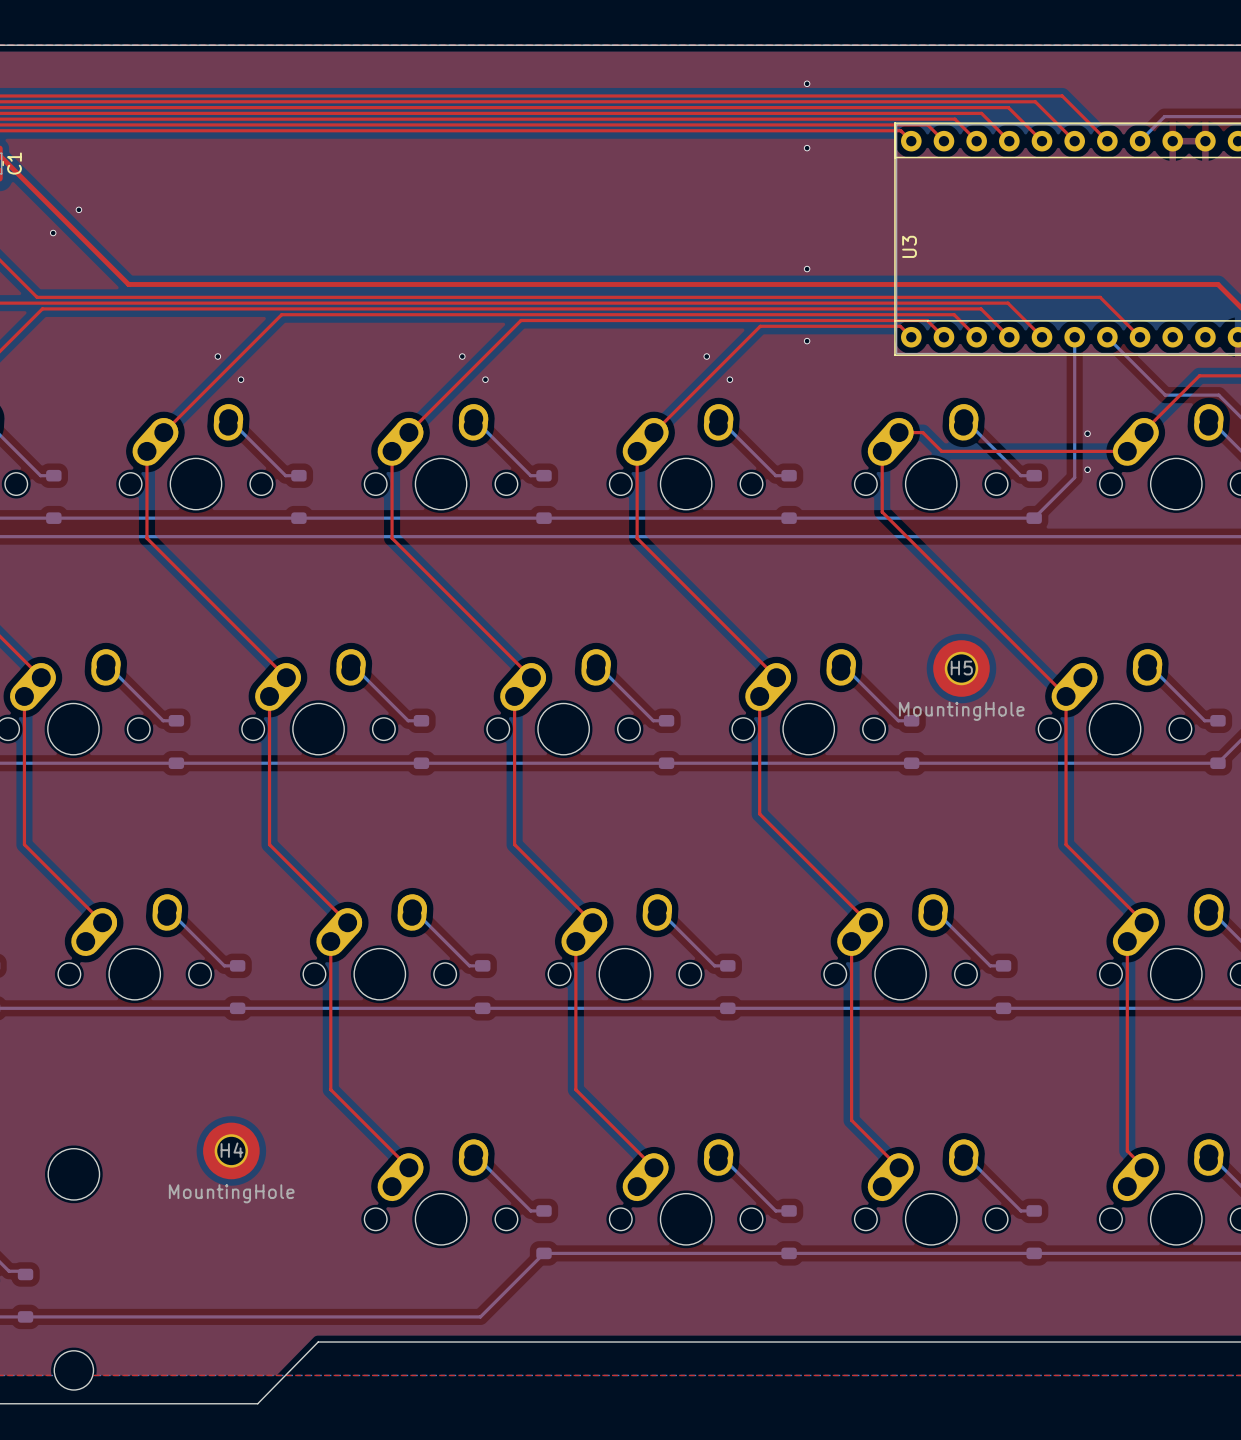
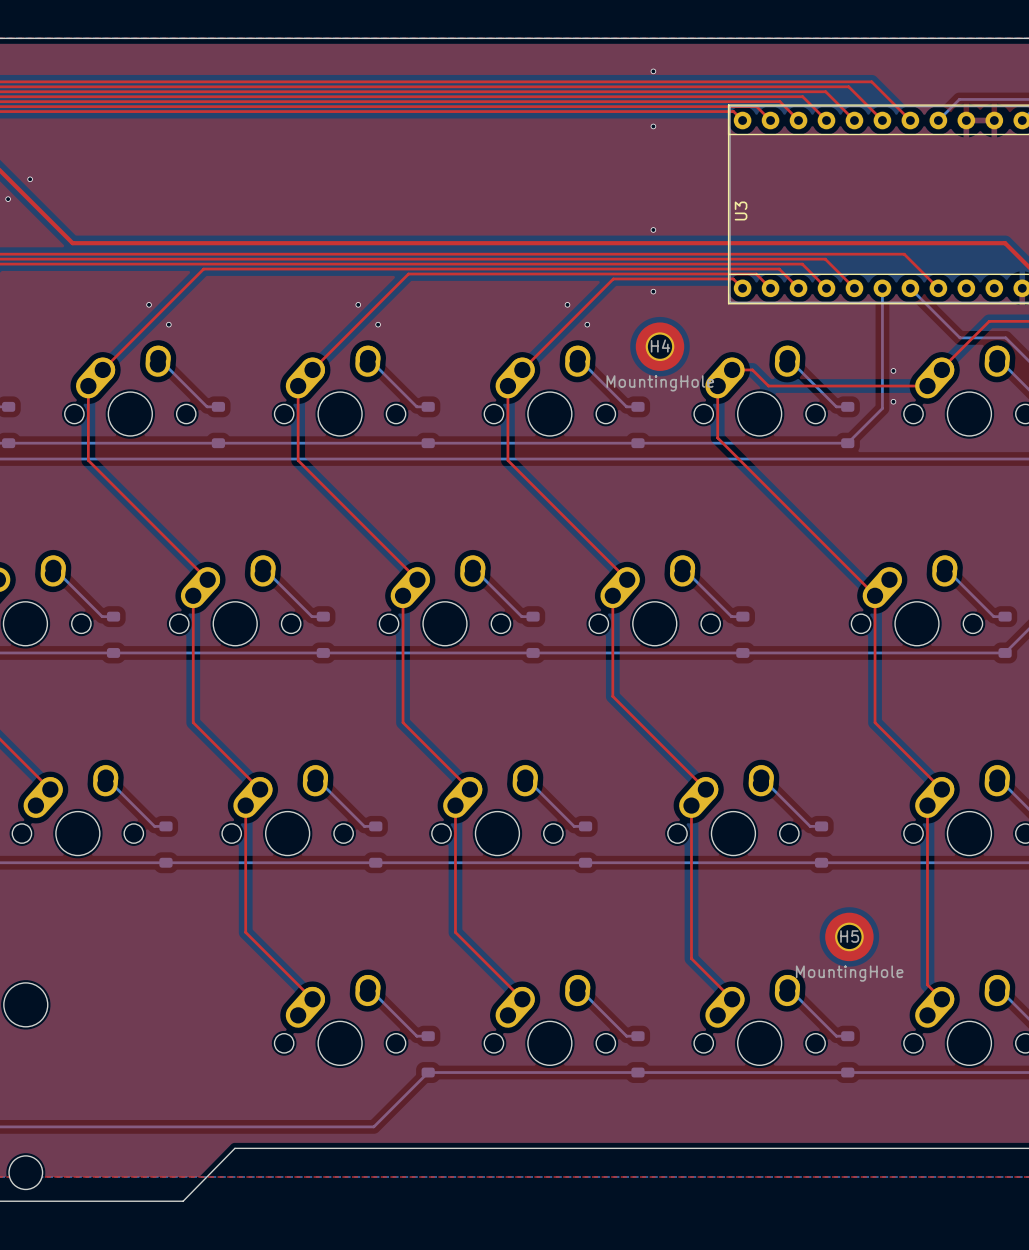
H5 position: (961, 668) -> (849, 936)
H4 position: (231, 1150) -> (660, 346)

